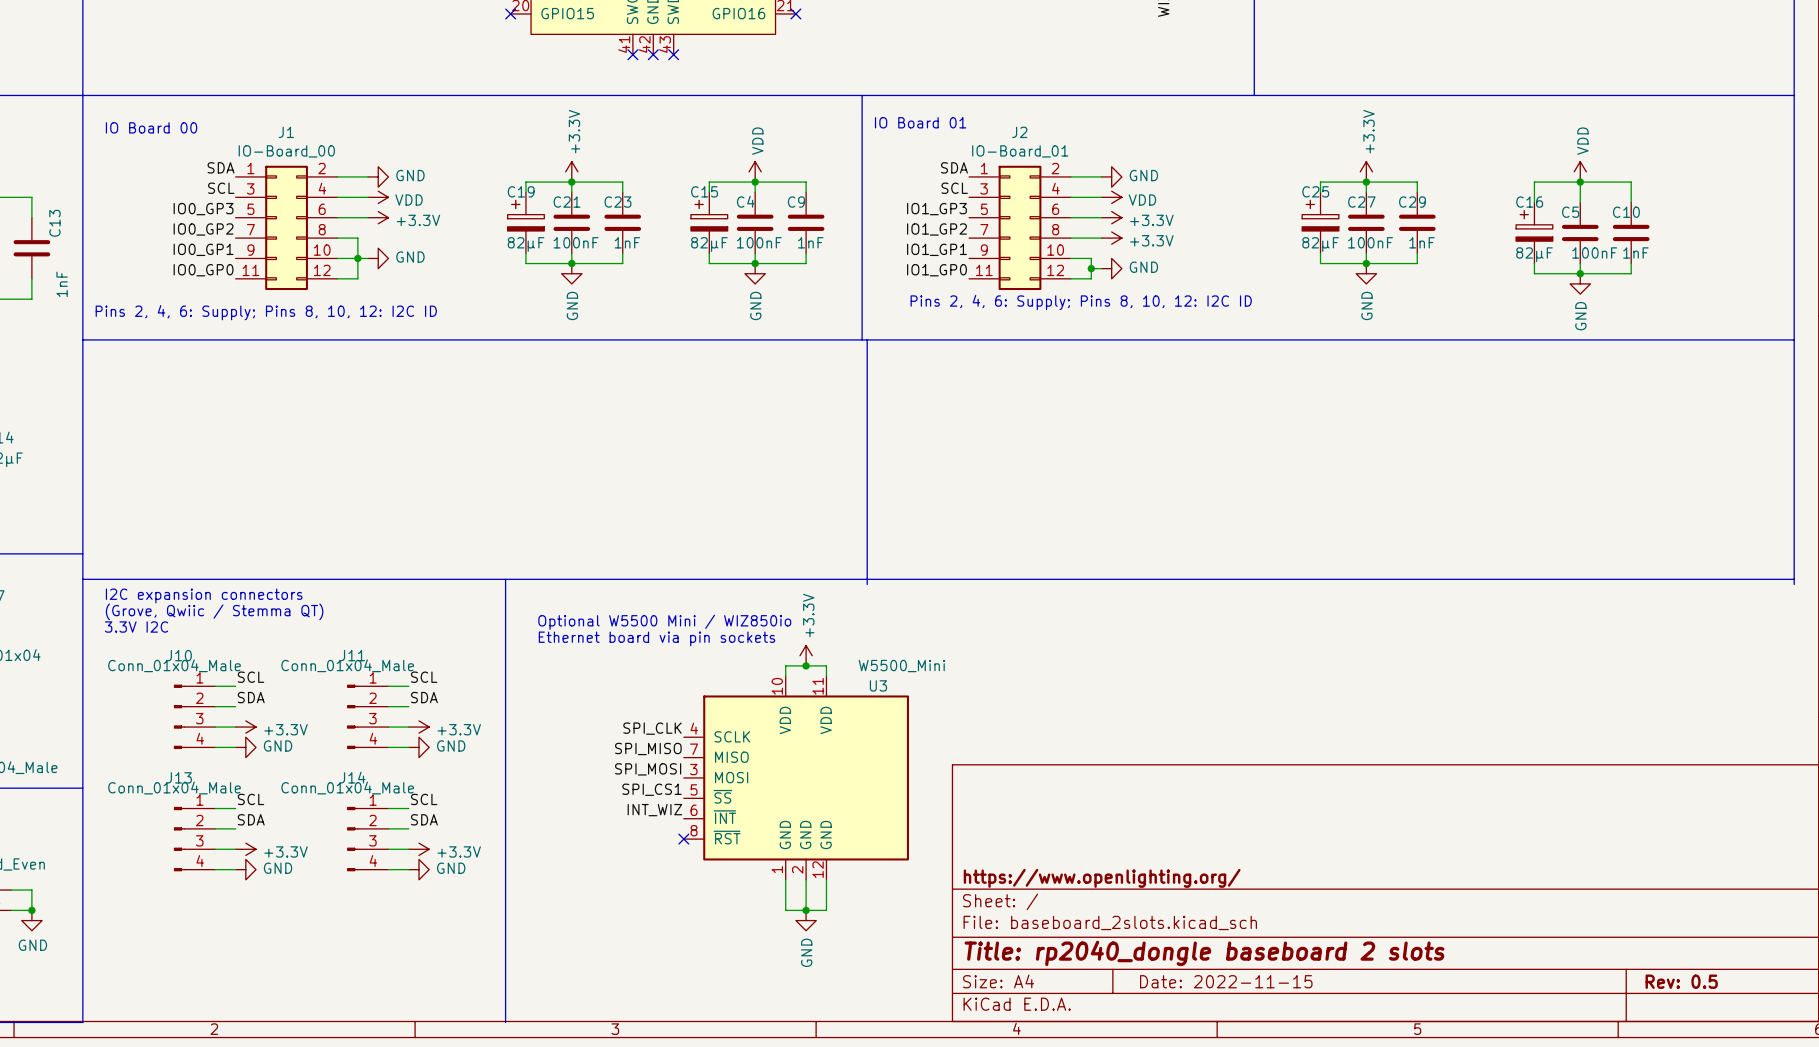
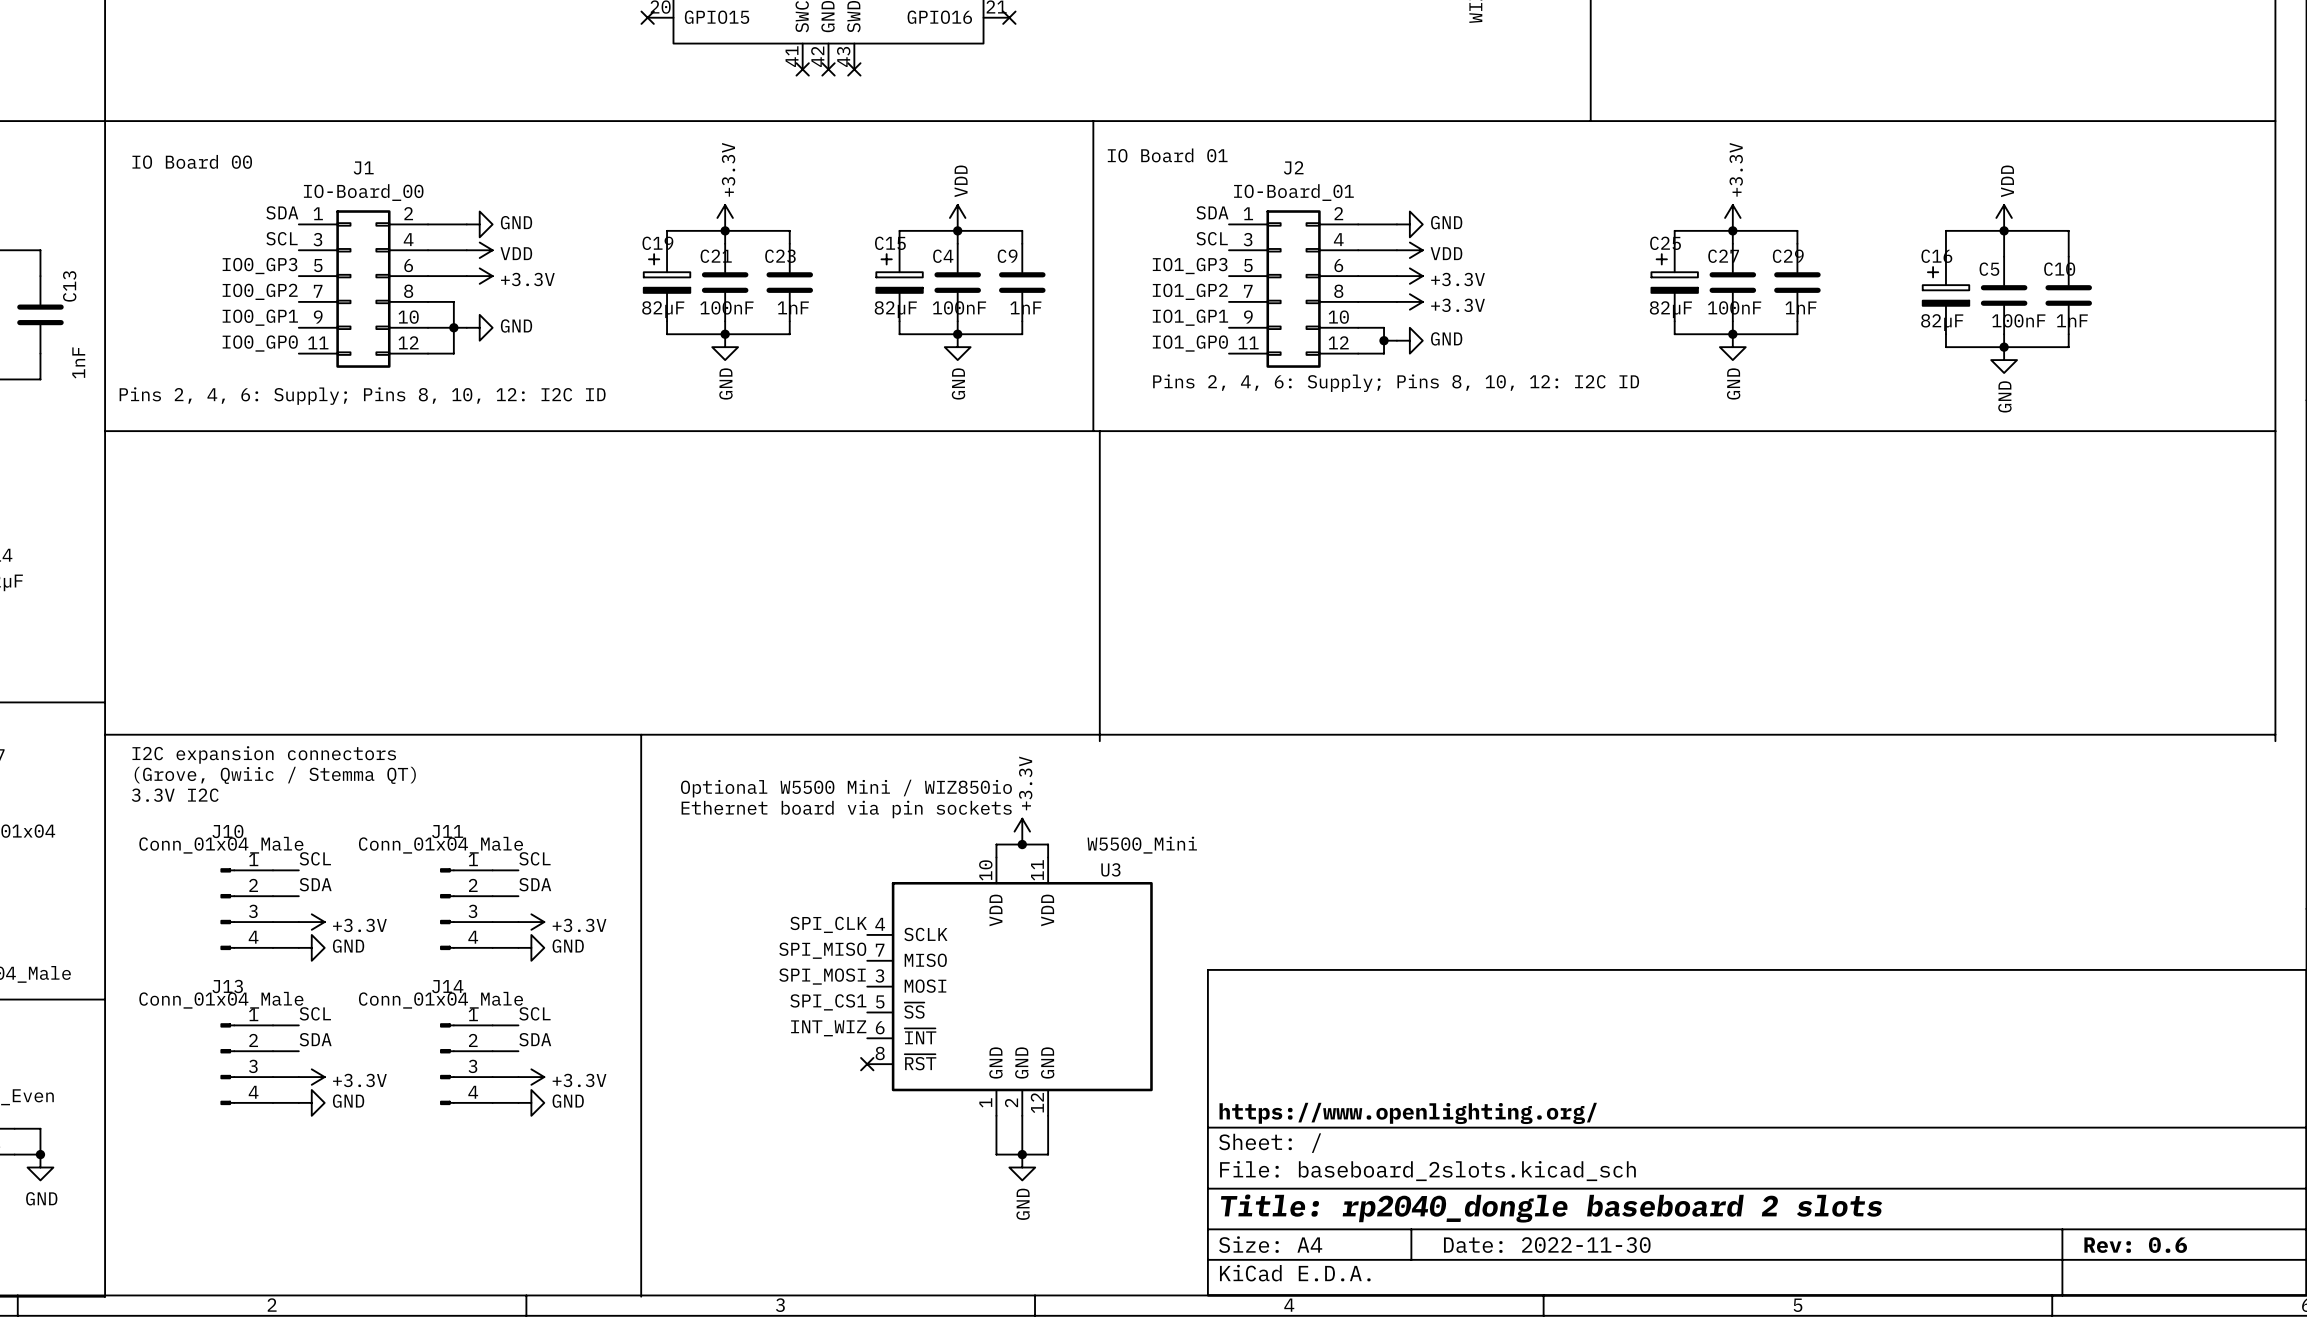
title block: Date: 2022-11-15 (1226, 981) -> Date: 2022-11-30 (1547, 1245)
title block: Rev: 0.5 (1681, 981) -> Rev: 0.6 (2135, 1245)

